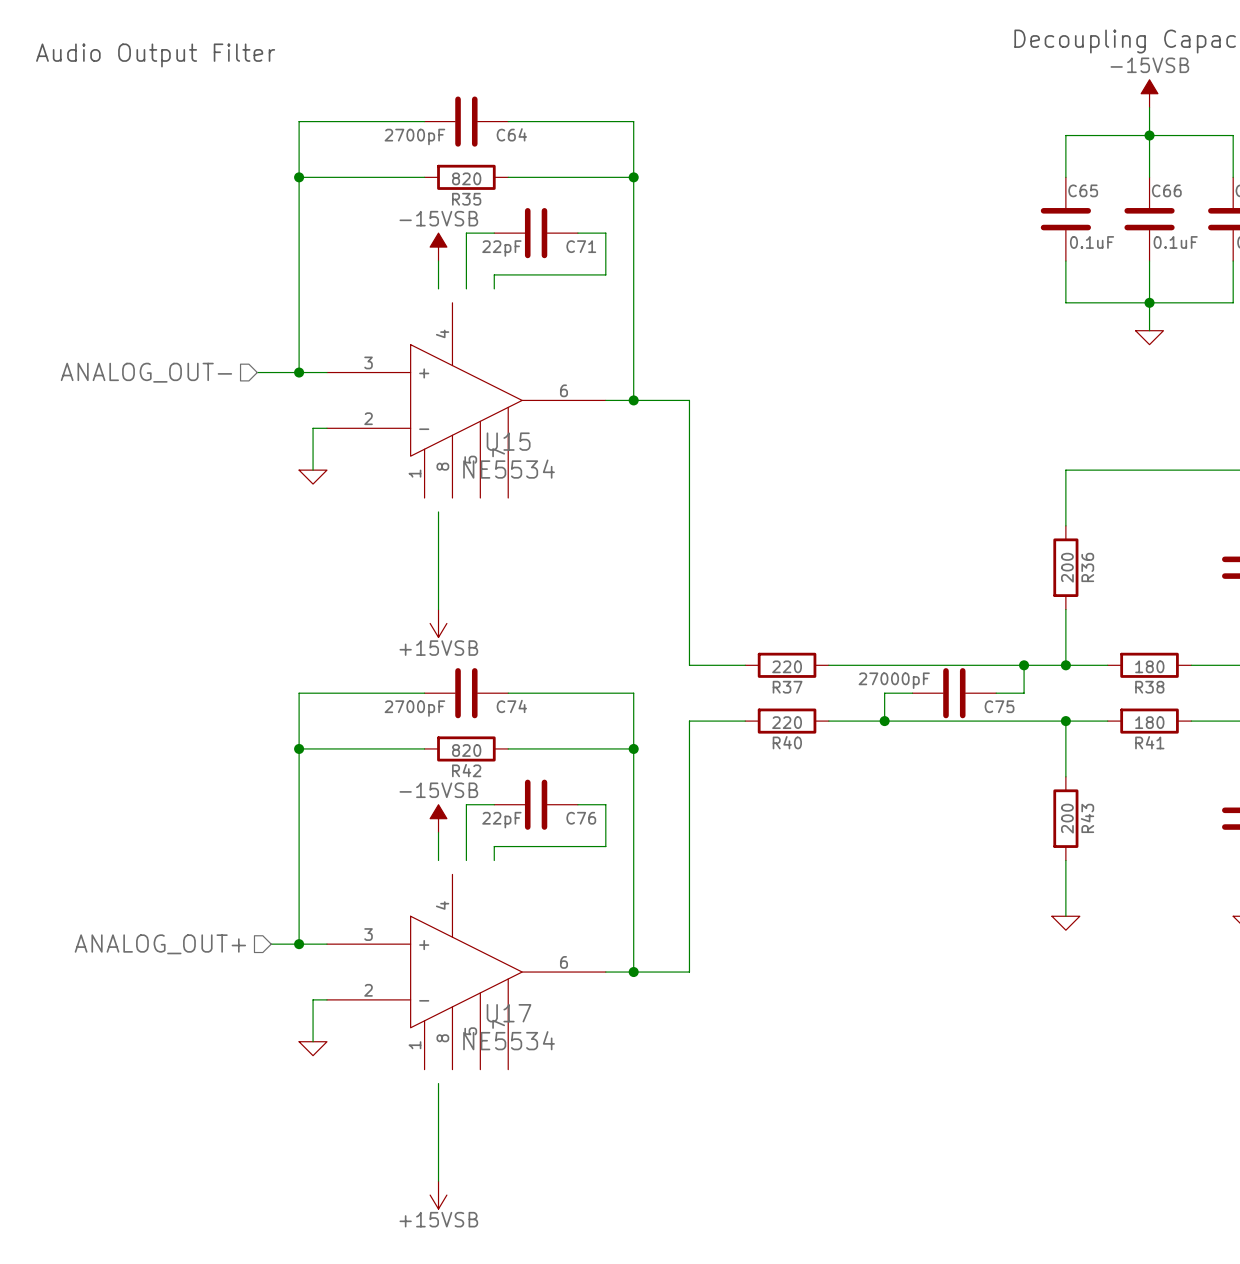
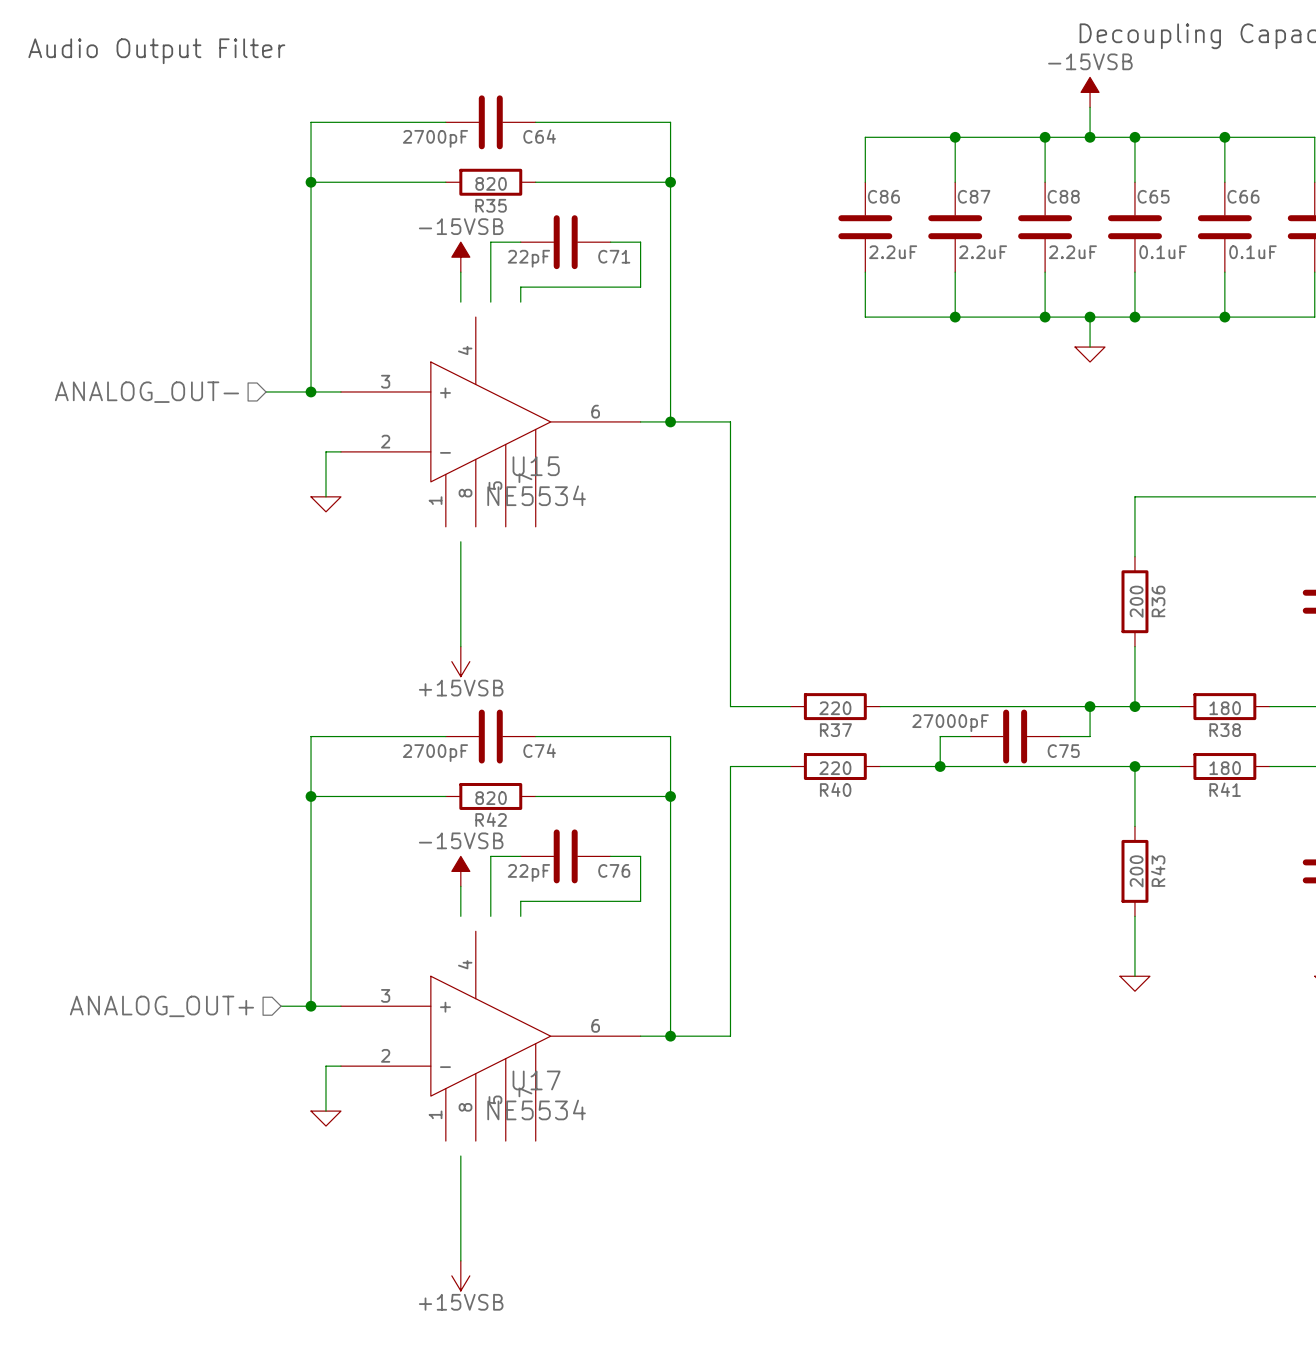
power symbol position: -15VSB (1149, 93) -> -15VSB (1090, 92)
wire: (1149, 107) (1149, 135) -> (1090, 107) (1090, 137)
wire: none -> (955, 137) (955, 182)
junction: none -> (955, 137)
wire: none -> (1045, 137) (1045, 182)
junction: none -> (1045, 137)
junction: none -> (1090, 137)
wire: none -> (1134, 137) (865, 137) (865, 182)
junction: none -> (1134, 137)
C86: none -> 2.2uF (865, 227)
C87: none -> 2.2uF (955, 227)
C88: none -> 2.2uF (1045, 227)
wire: none -> (865, 272) (865, 317) (1134, 317)
wire: none -> (955, 272) (955, 317)
wire: none -> (1045, 272) (1045, 317)
junction: none -> (955, 317)
junction: none -> (1045, 317)
junction: none -> (1090, 317)
junction: none -> (1134, 317)
wire: (1149, 302) (1149, 330) -> (1090, 317) (1090, 347)
power symbol position: (1149, 337) -> (1090, 354)

